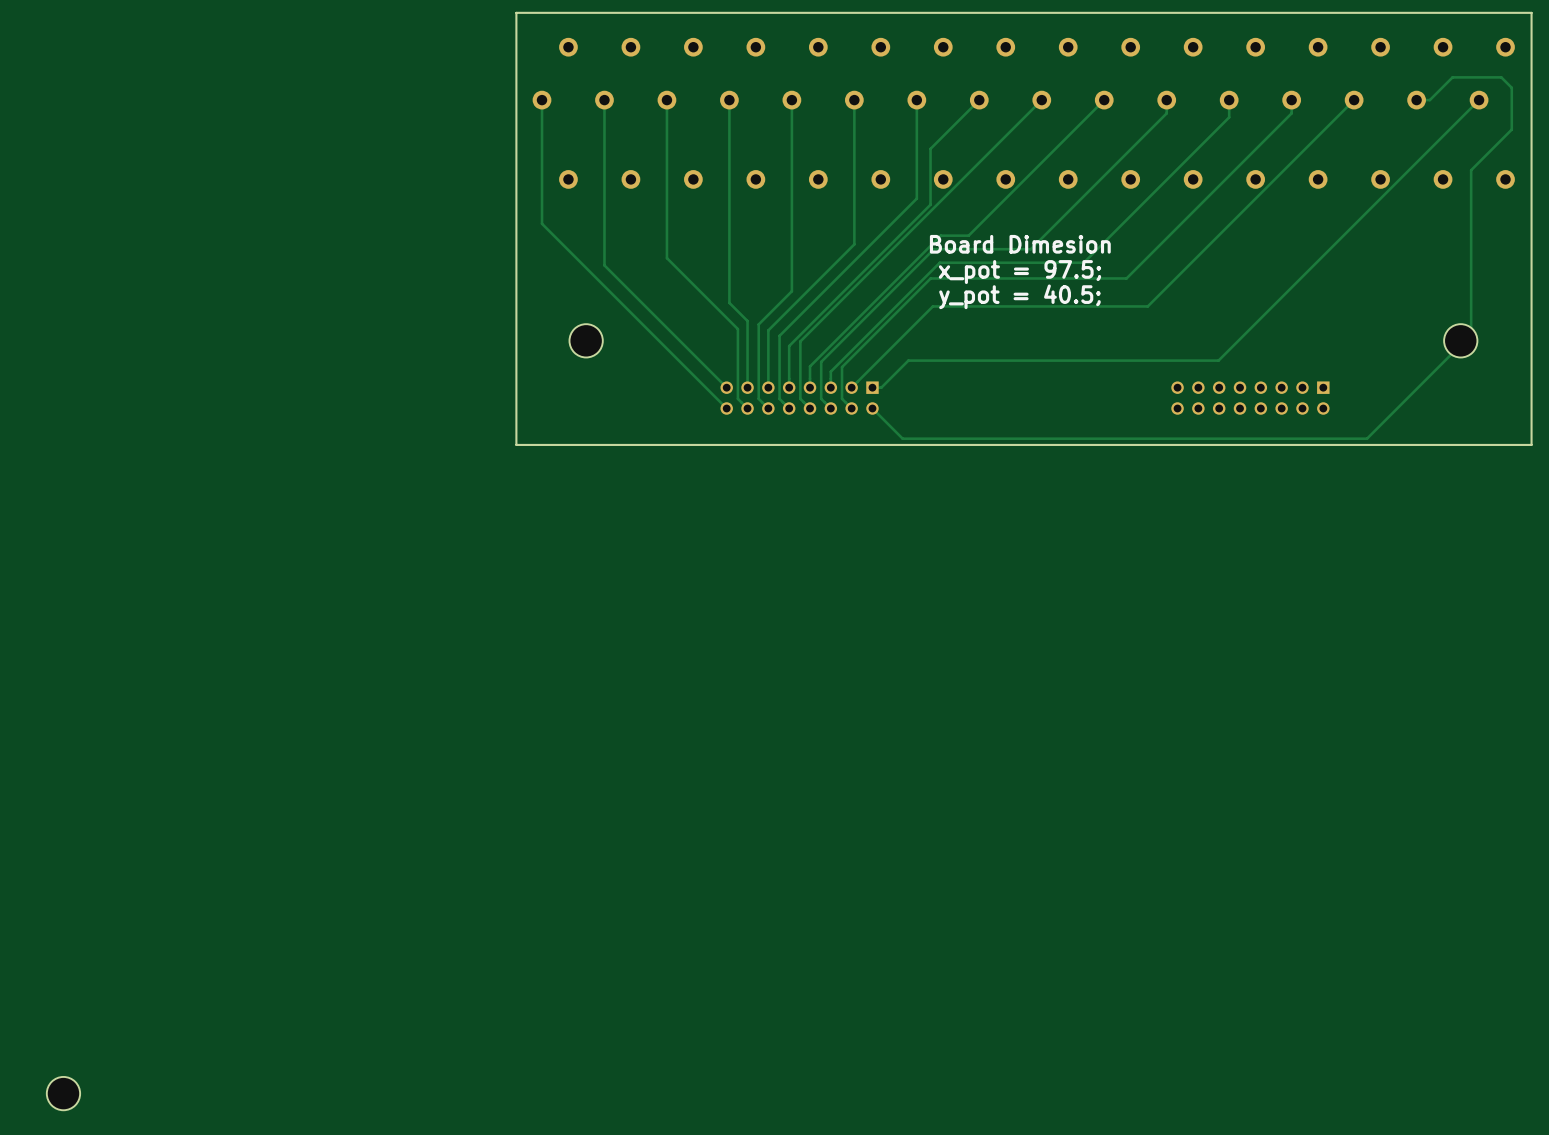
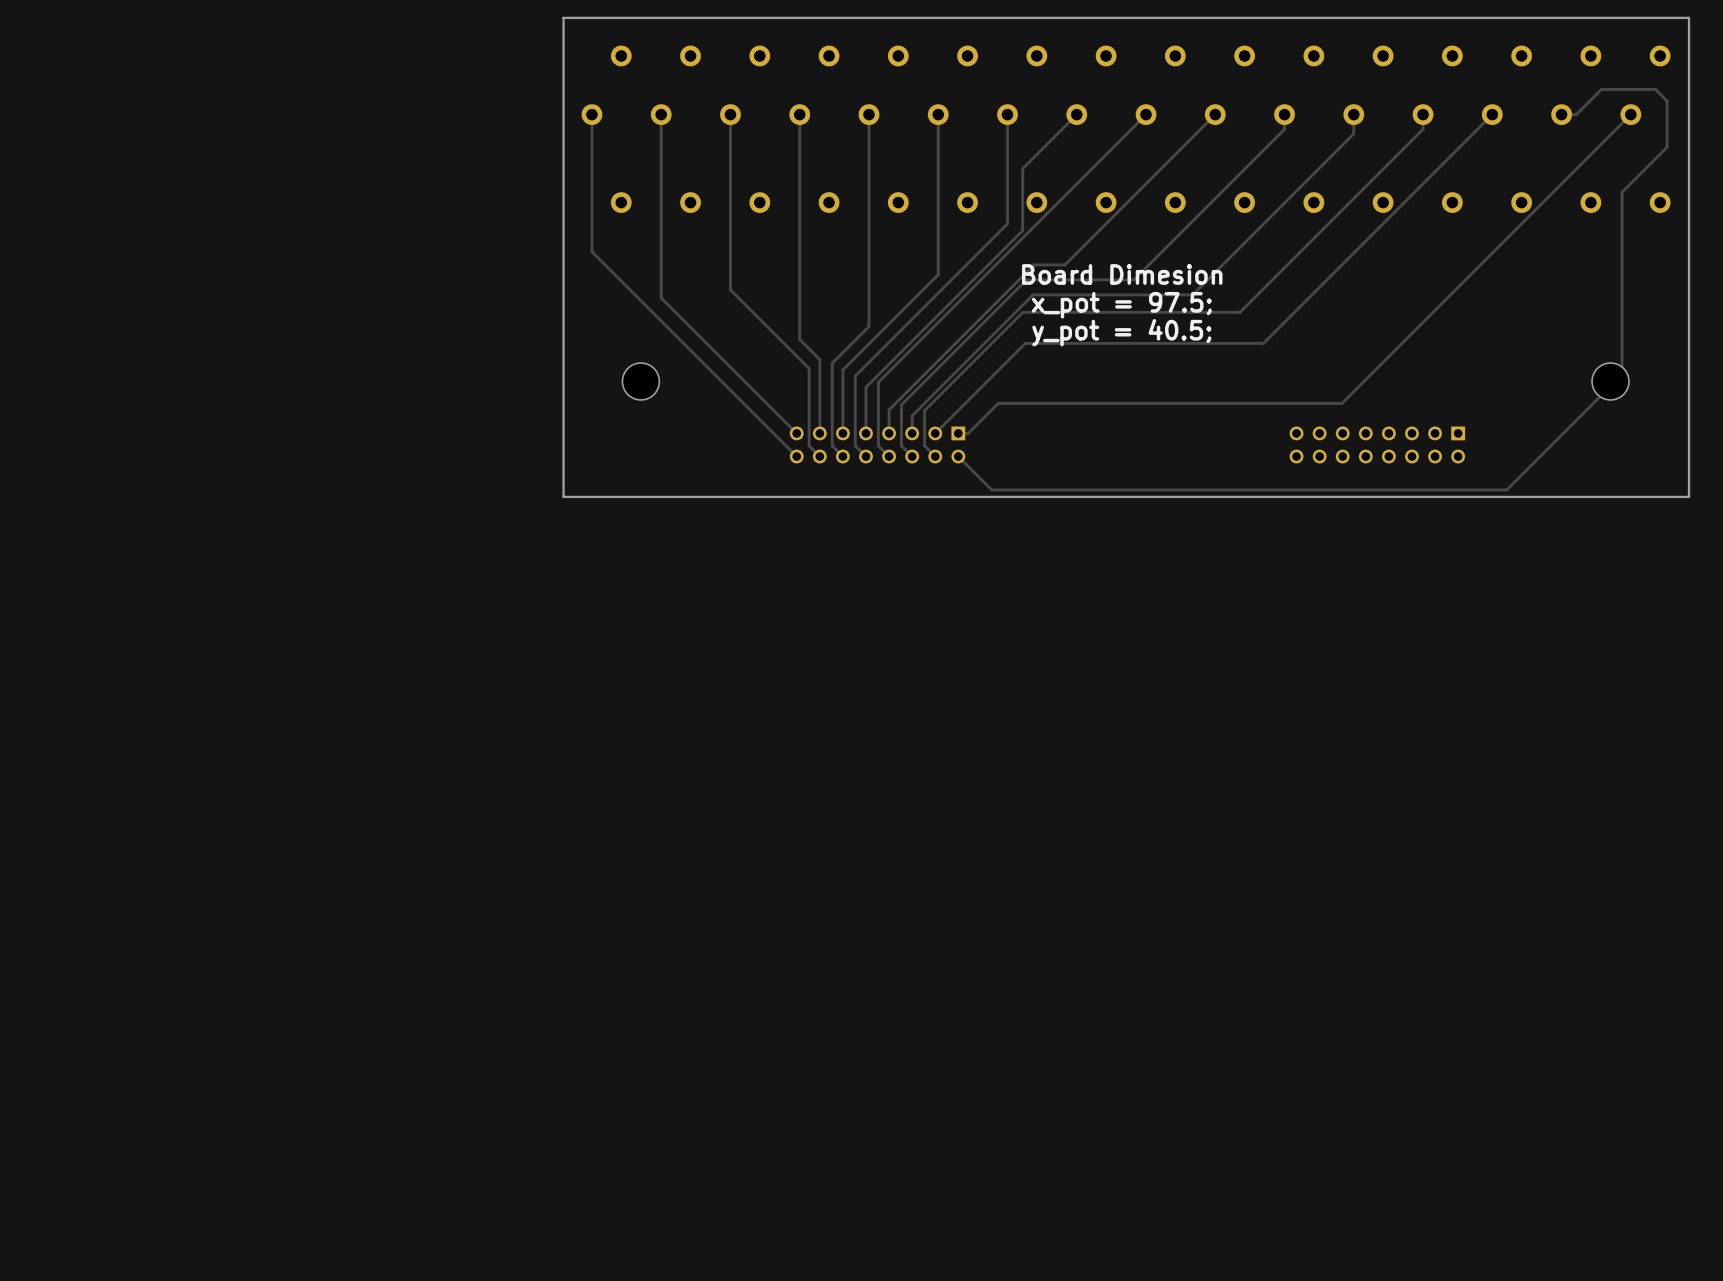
part: (63, 1093) -> none

